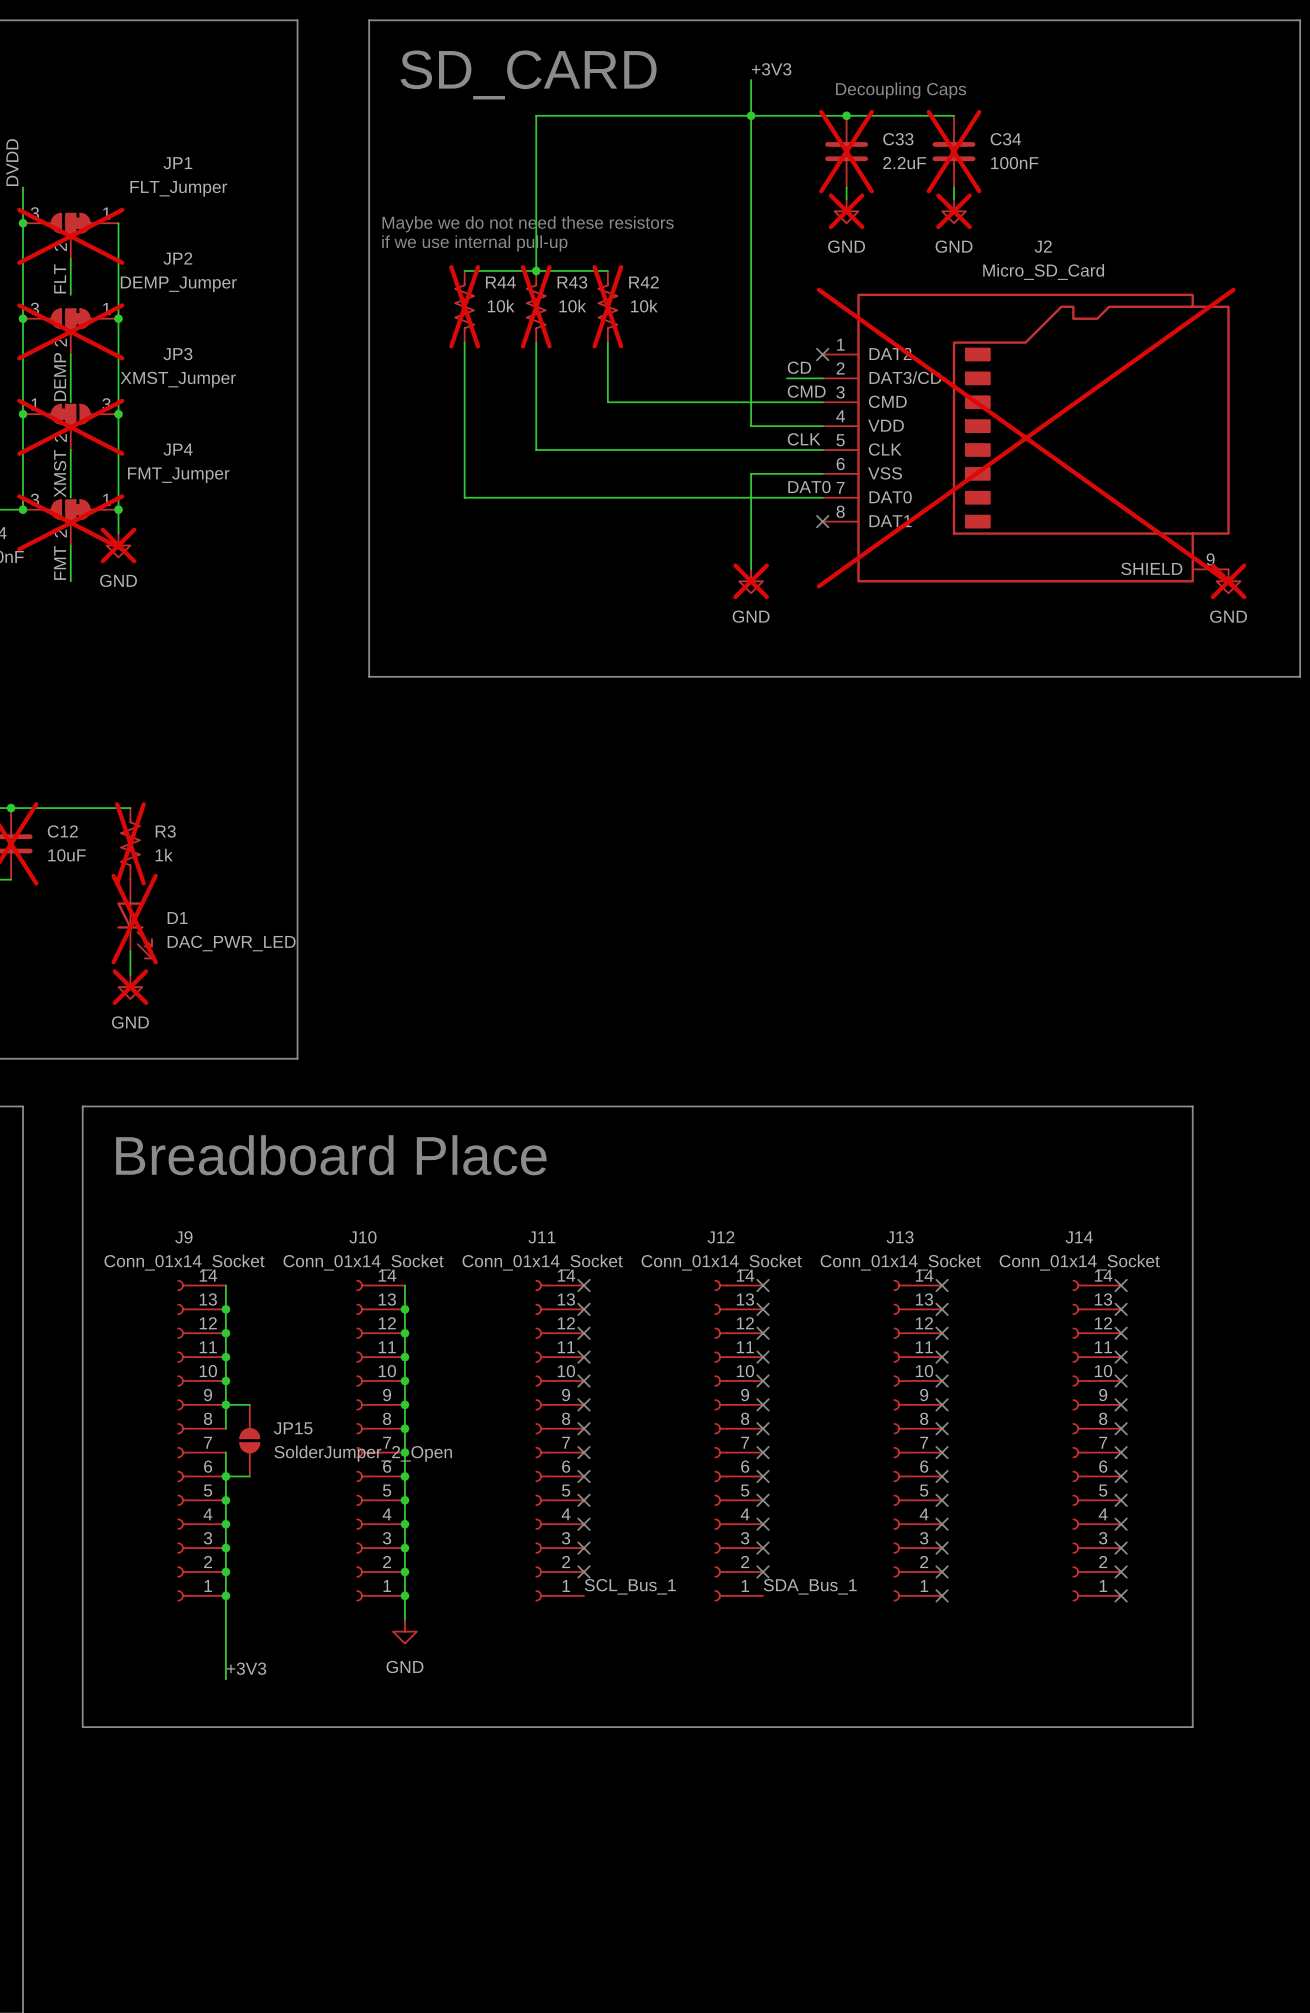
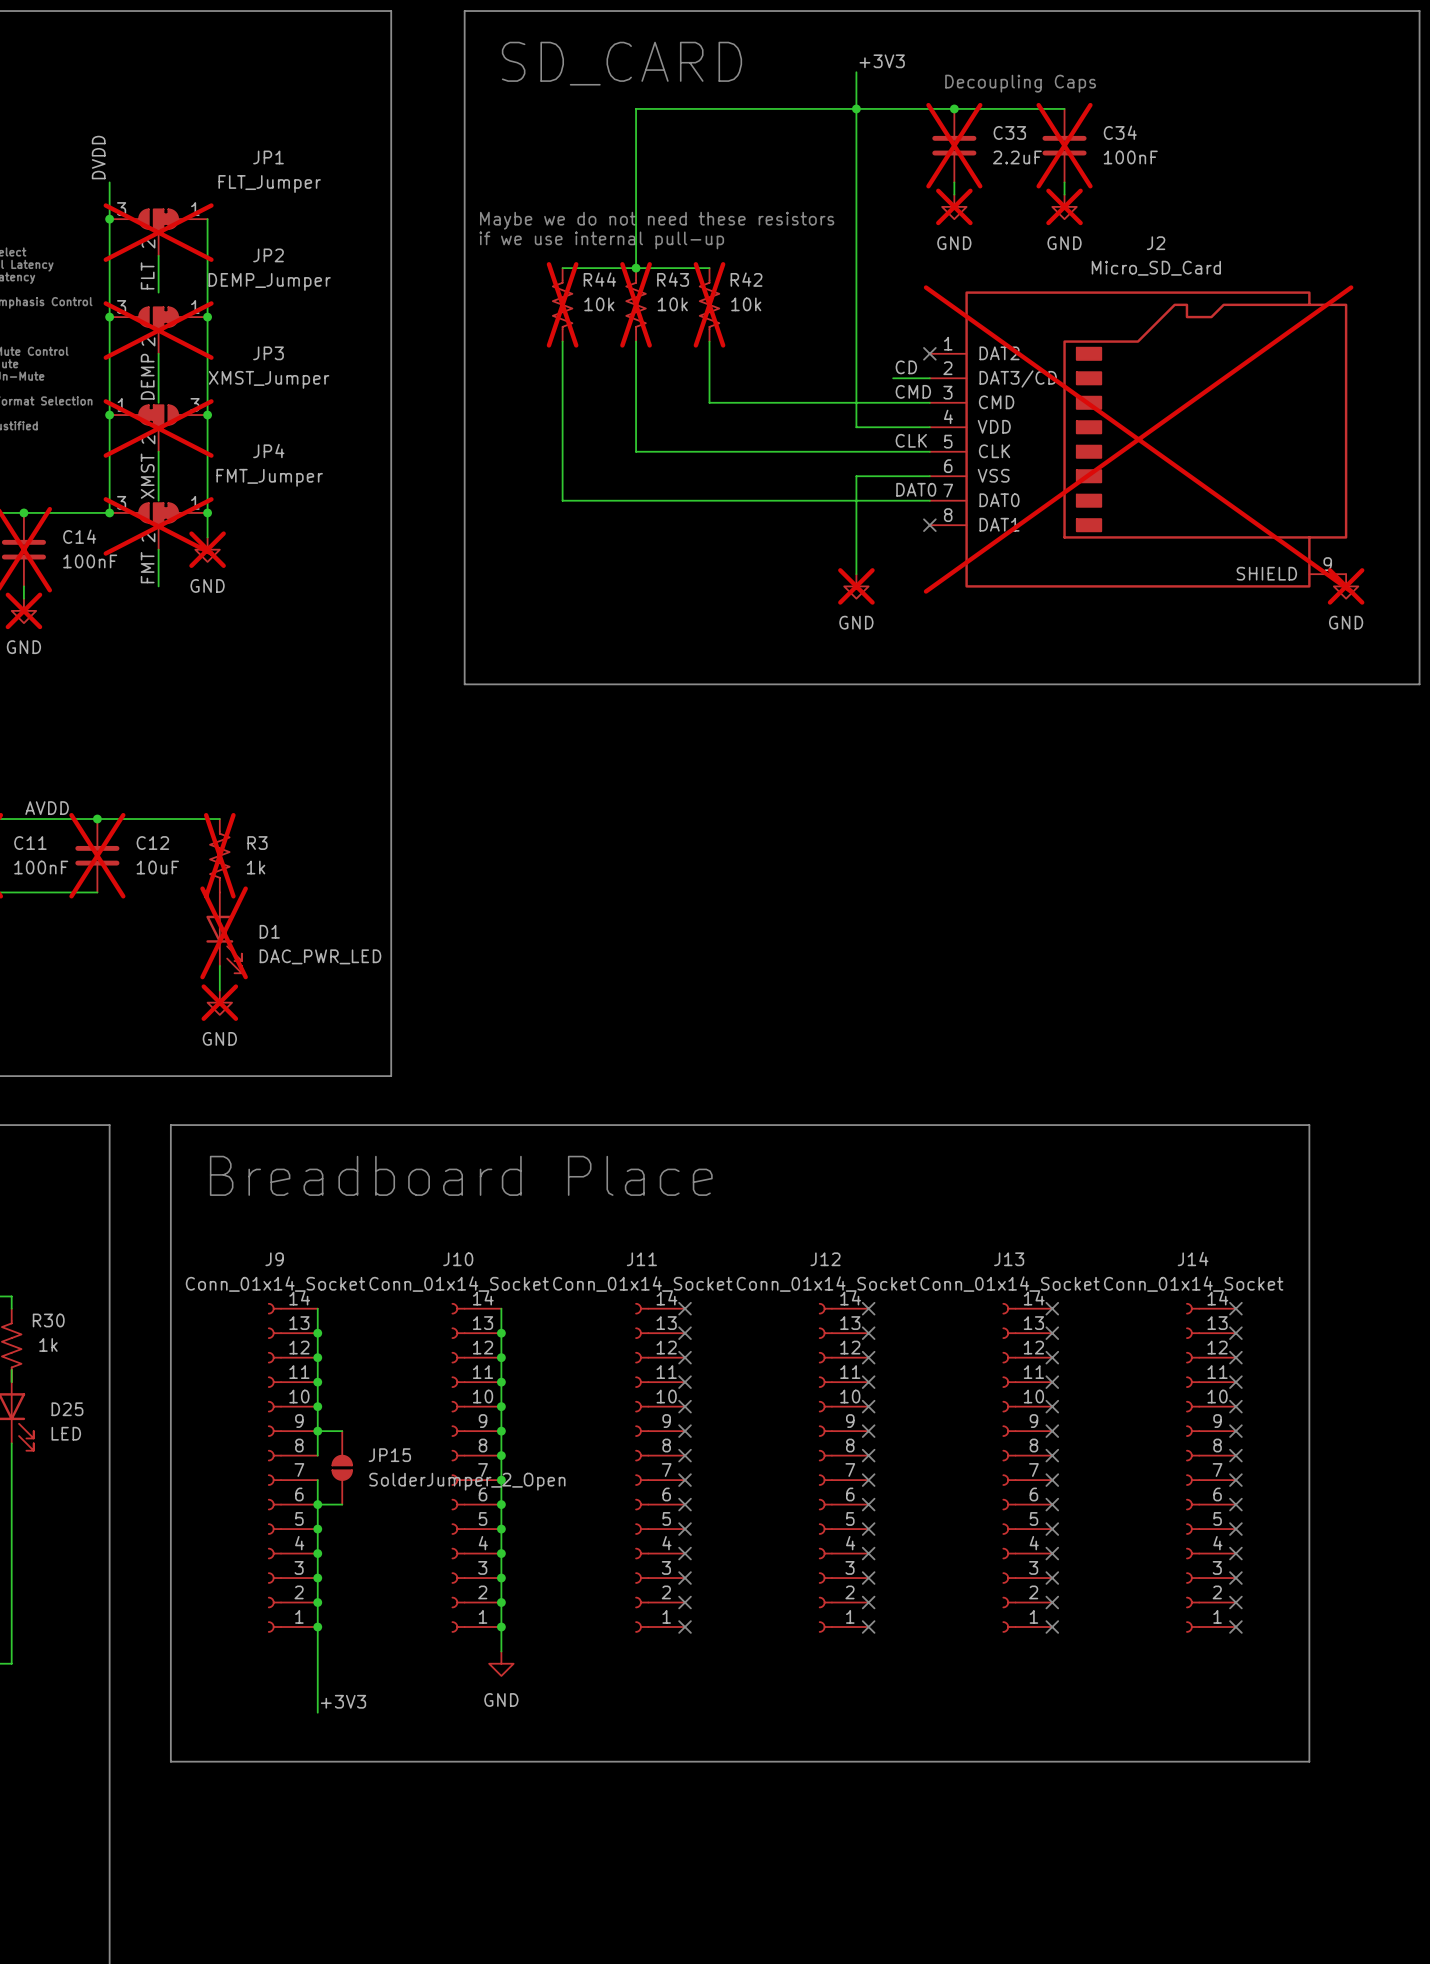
label: SCL_Bus_1 (630, 1586) -> none
label: SDA_Bus_1 (810, 1586) -> none
no-connect mark: none -> (685, 1627)
no-connect mark: none -> (868, 1627)

